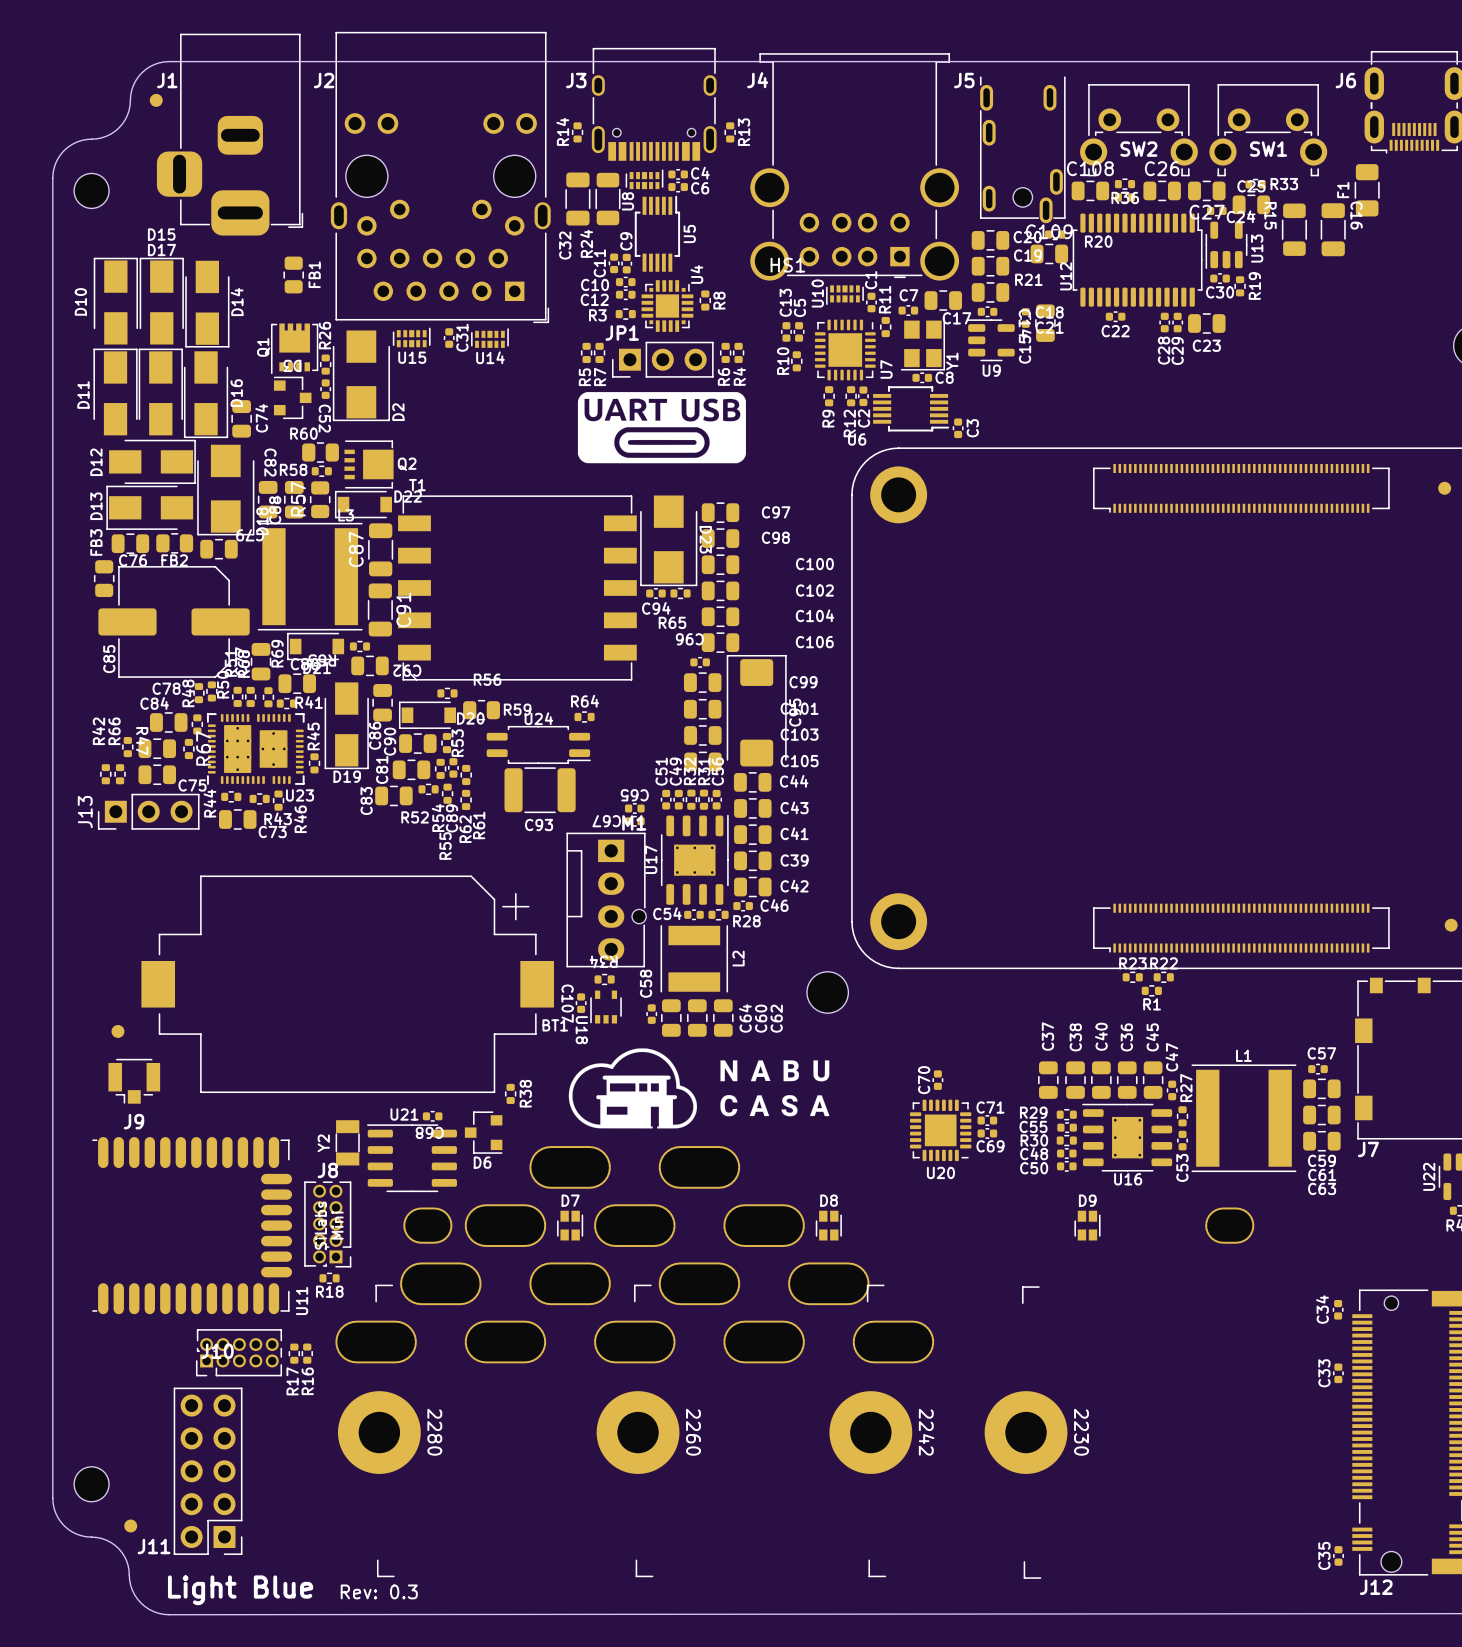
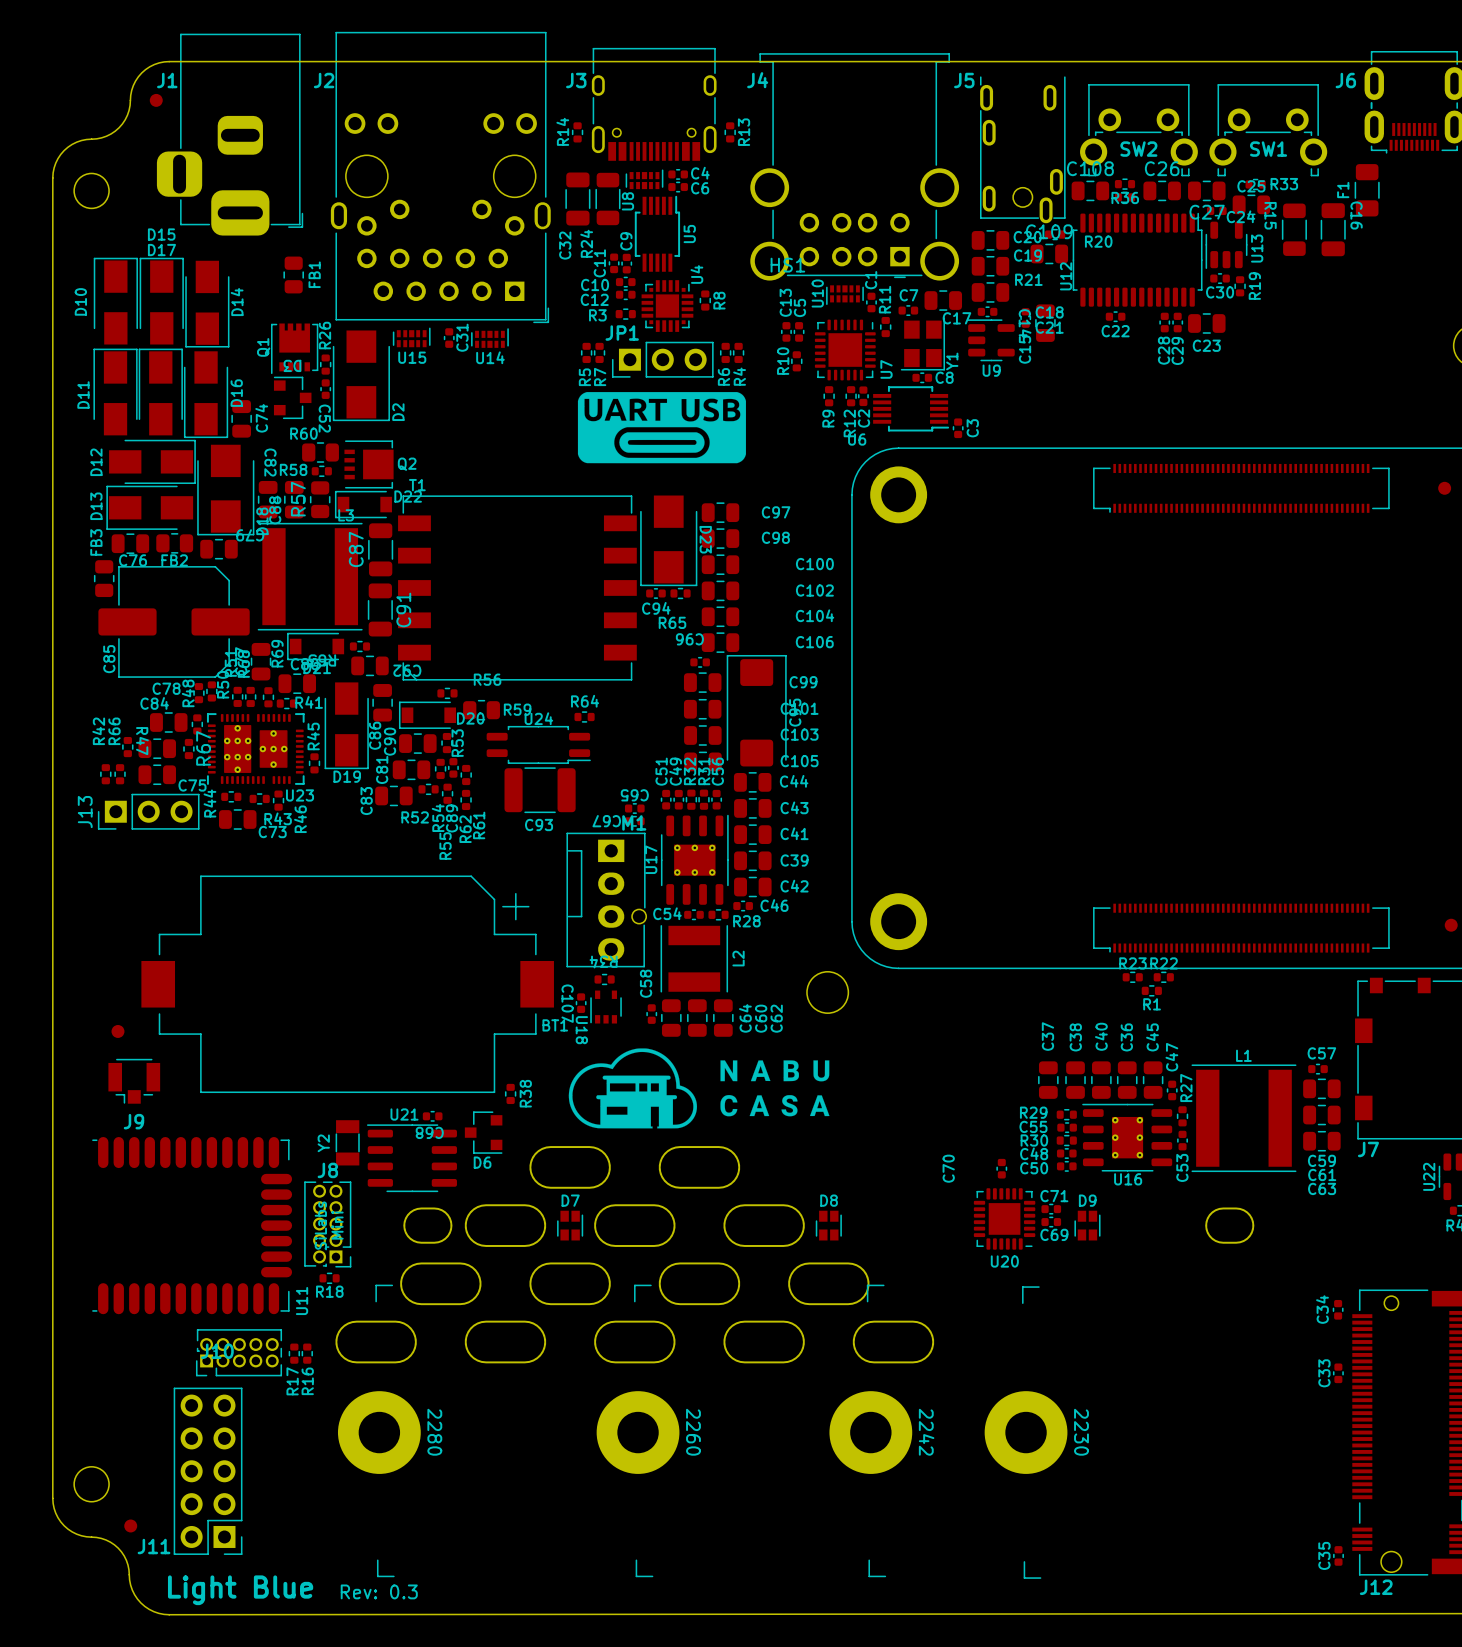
C70 name position: C70 (924, 1080) -> C70 (948, 1168)
C70 position: (937, 1080) -> (1001, 1168)
C71 position: (987, 1120) -> (1051, 1209)
U20 position: (940, 1130) -> (1004, 1218)
C69 position: (987, 1133) -> (1051, 1222)

